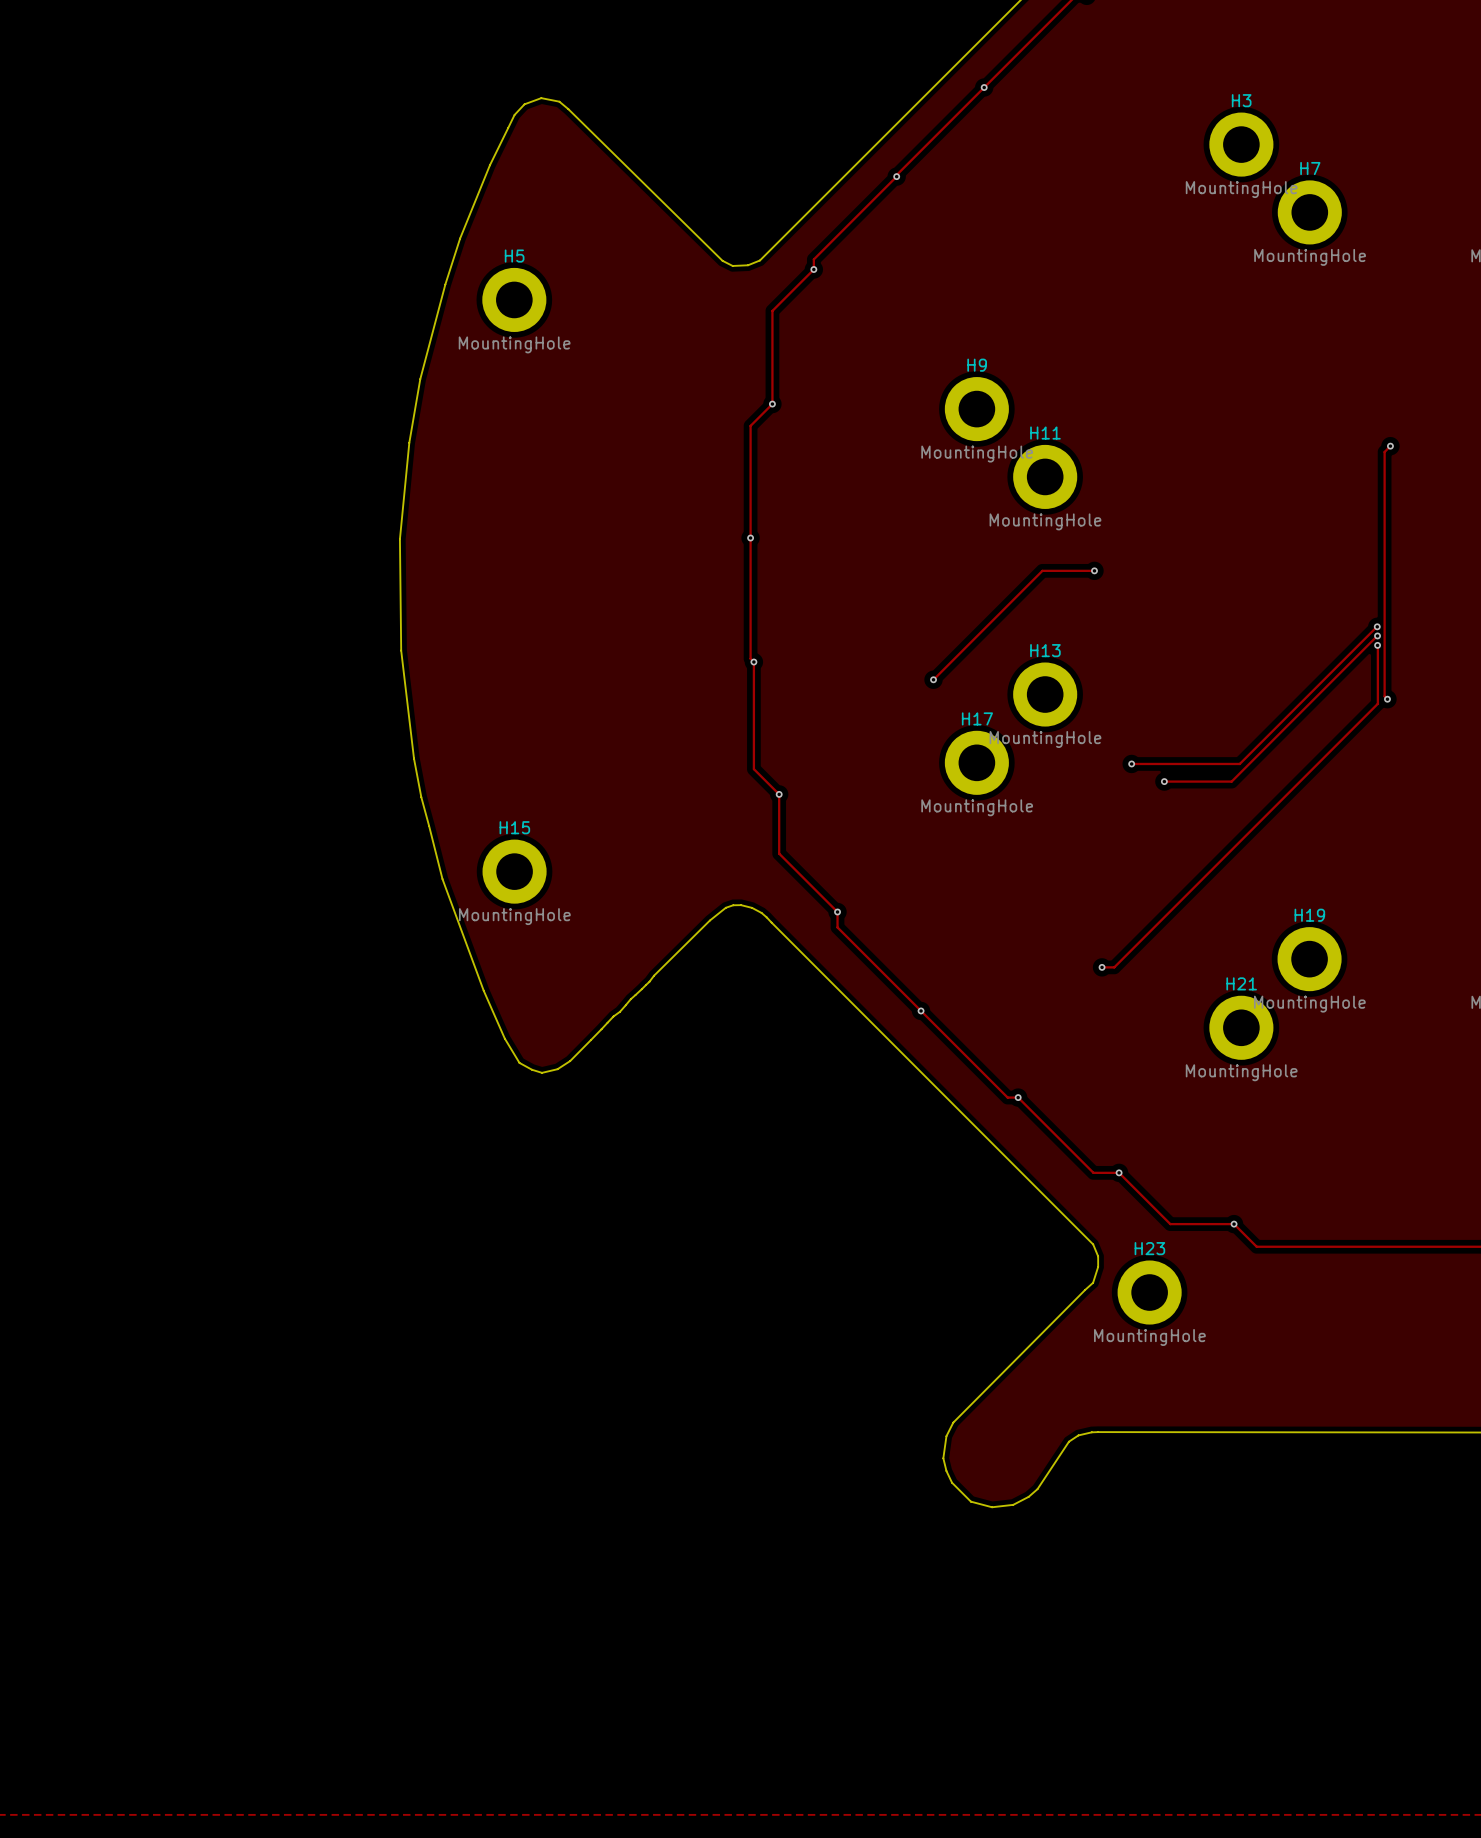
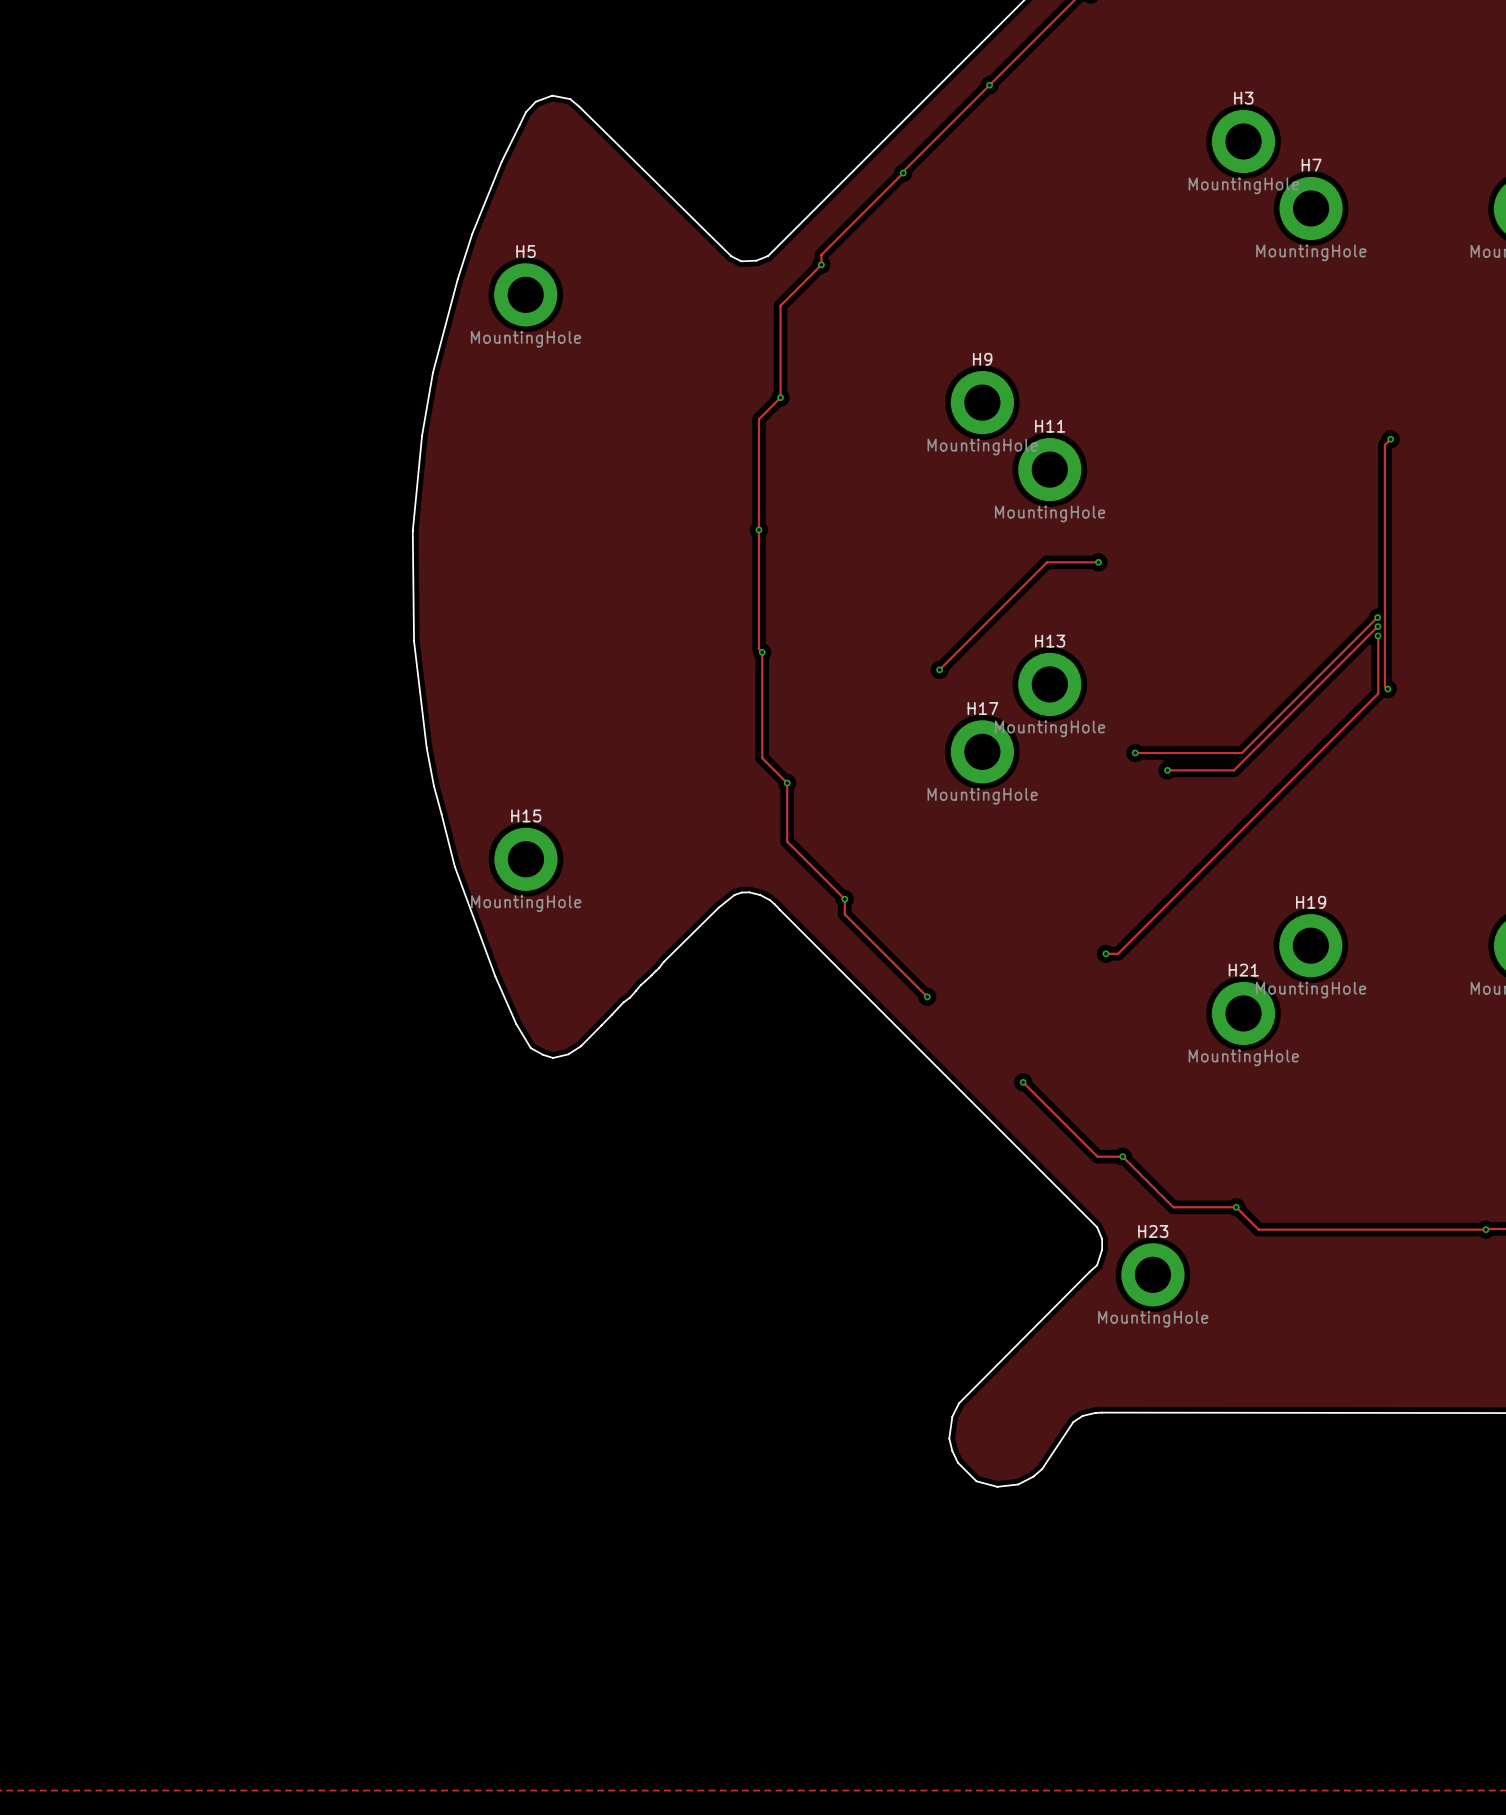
track: (921, 1010) (1007, 1097) (1018, 1097) -> none

